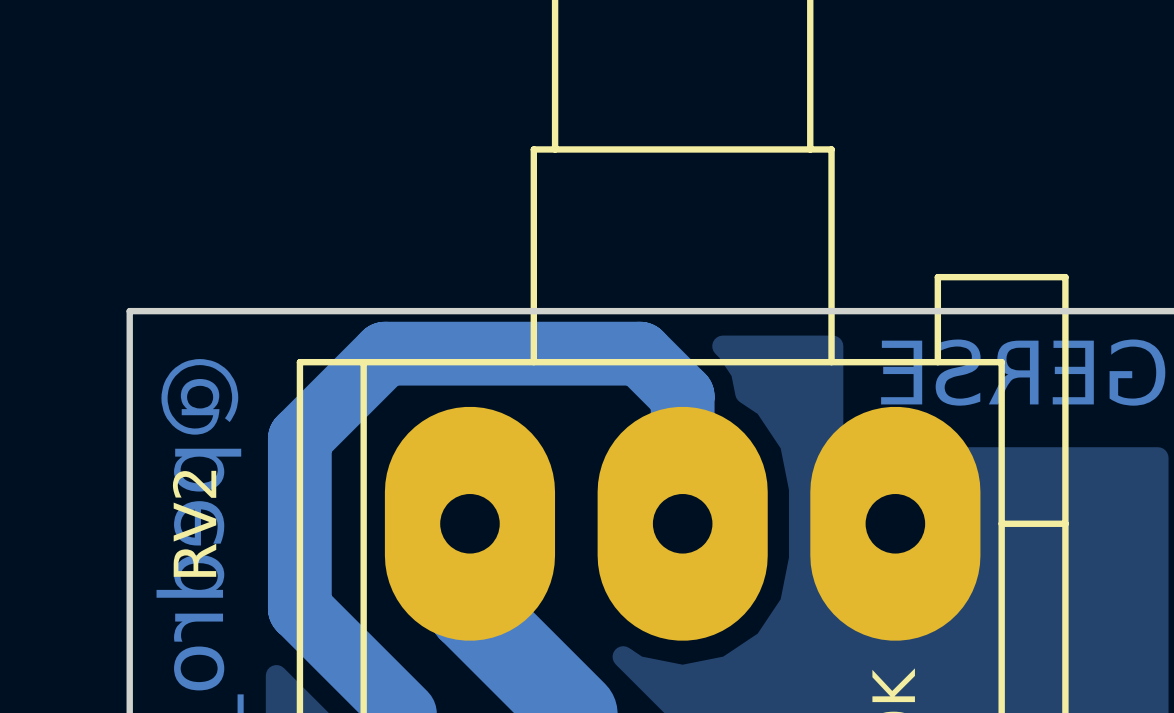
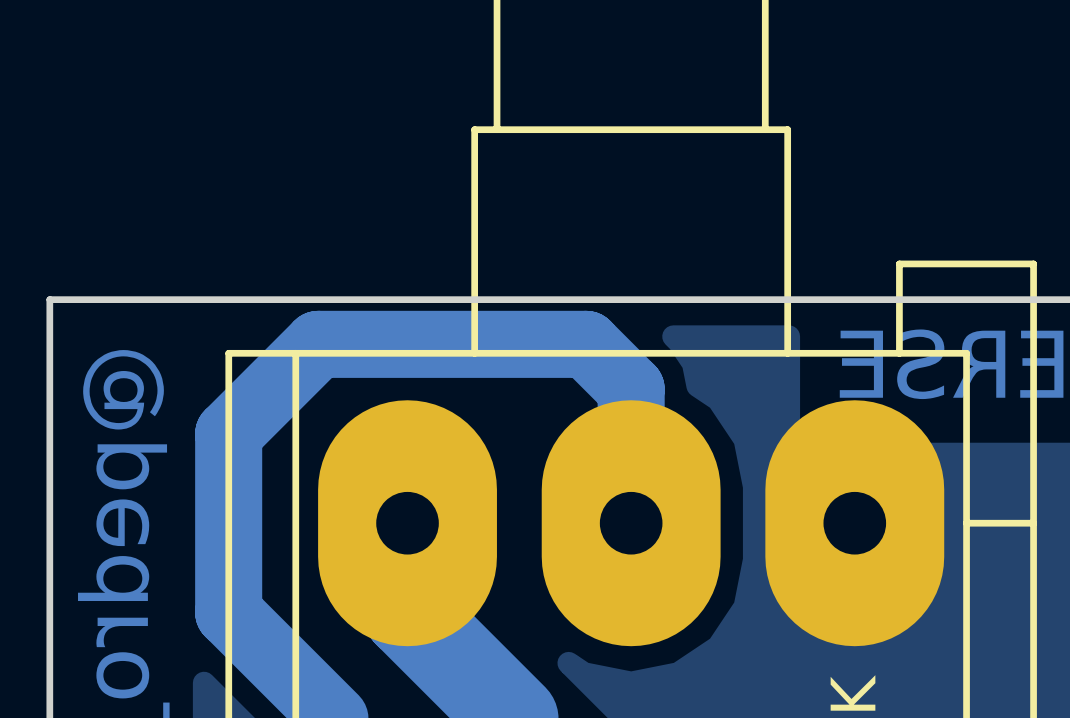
RV2 name: RV2 (194, 523) -> none

